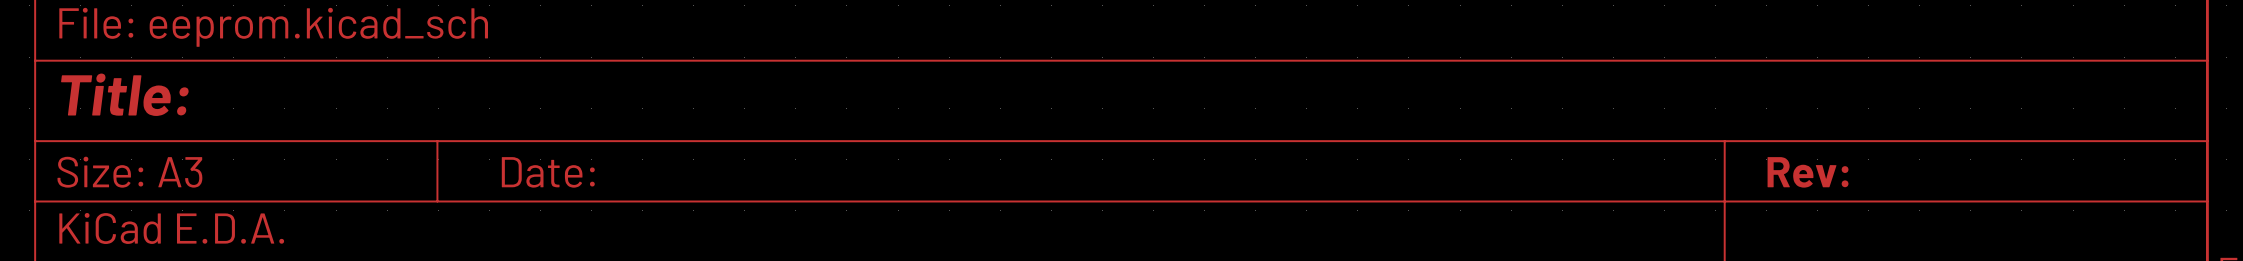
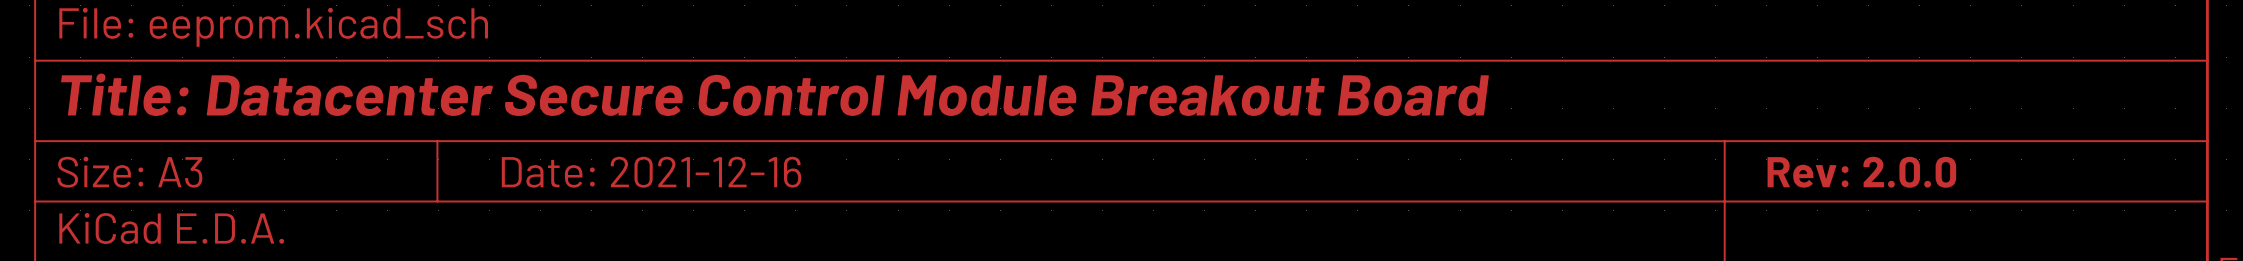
title block: Title: (124, 94) -> Title: Datacenter Secure Control Module Breakout Board (774, 94)
title block: Date: (548, 172) -> Date: 2021-12-16 (651, 172)
title block: Rev: (1808, 172) -> Rev: 2.0.0 (1861, 172)

